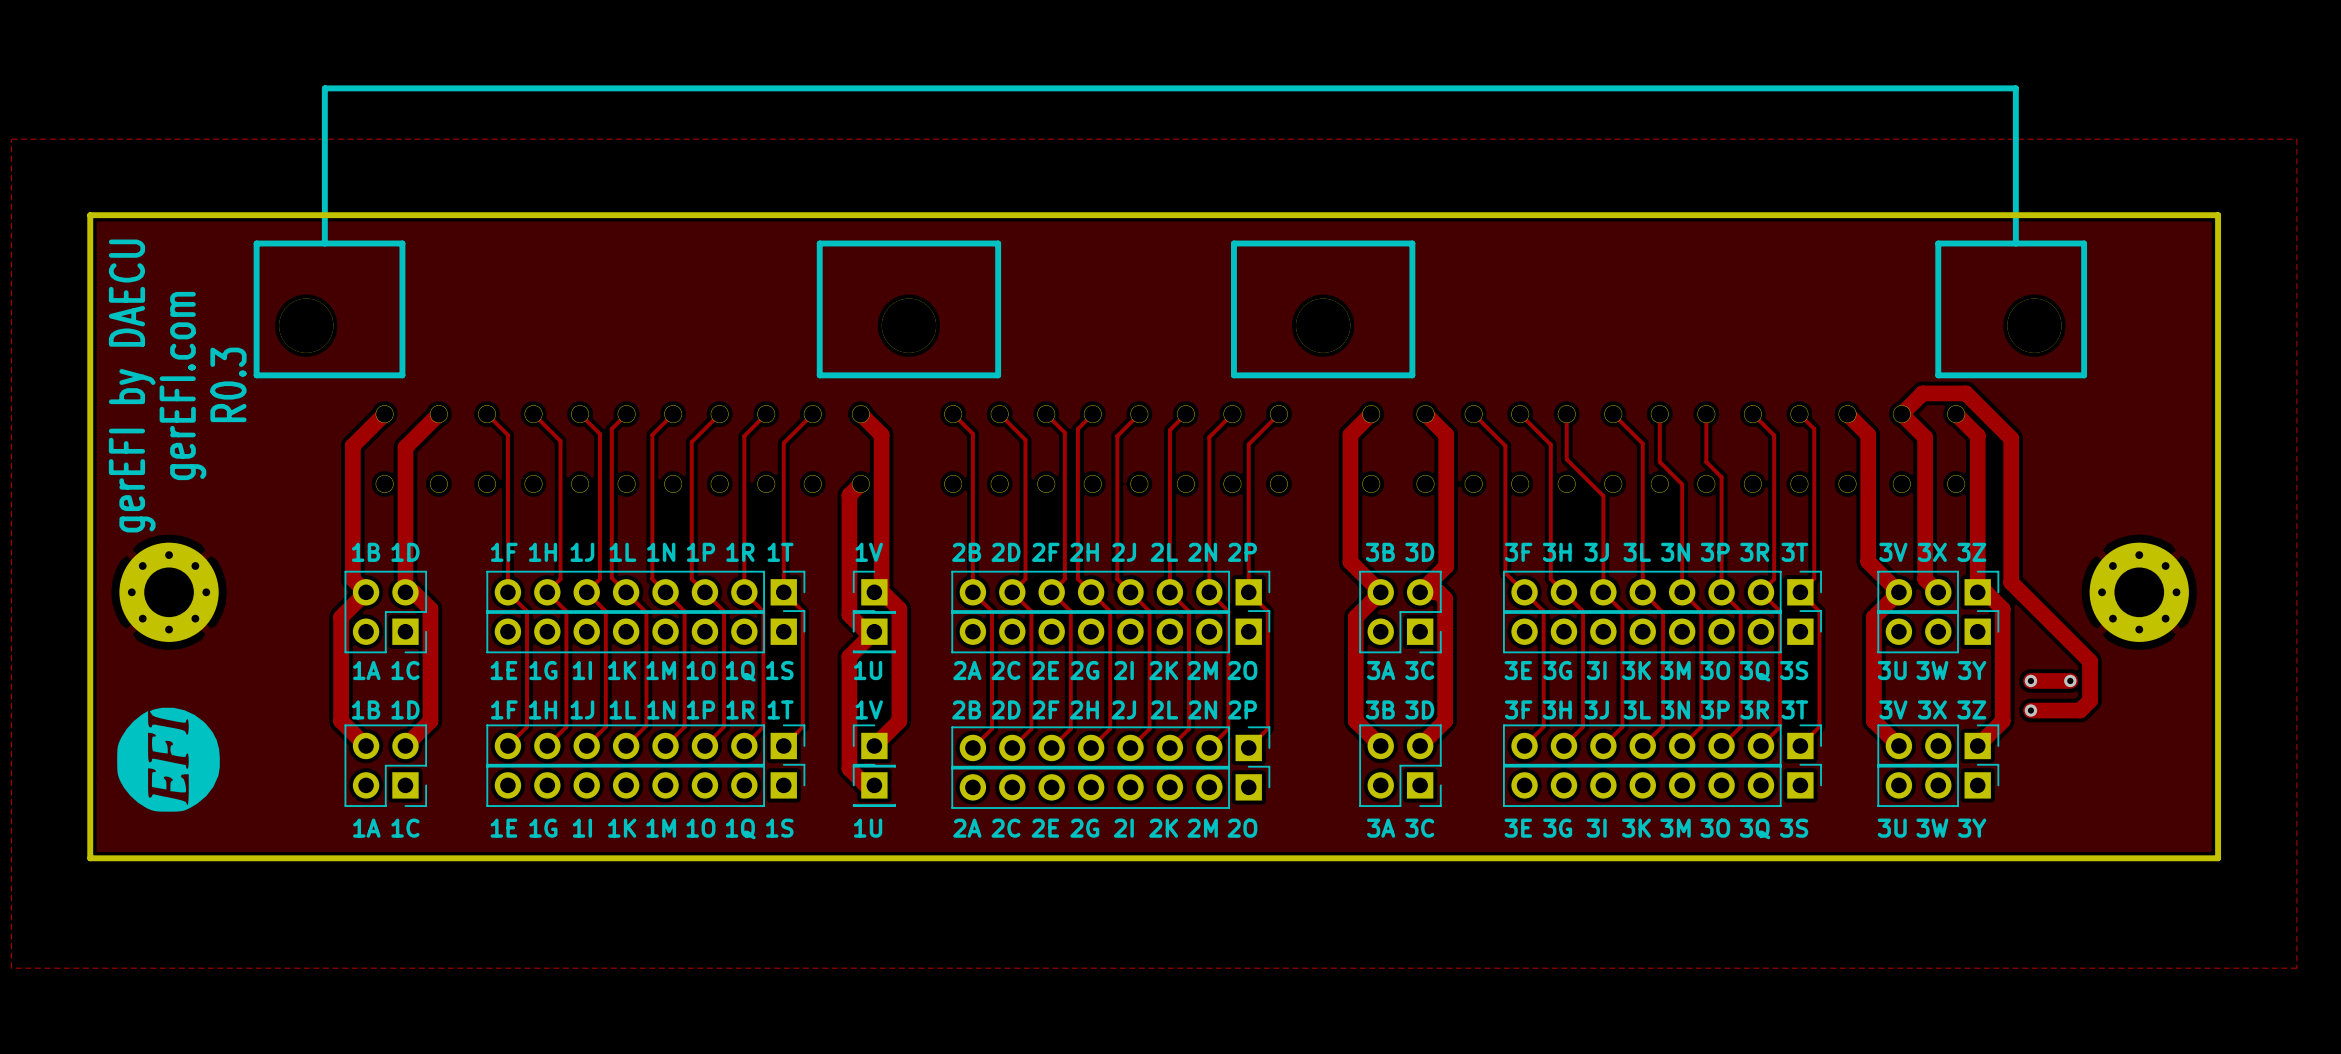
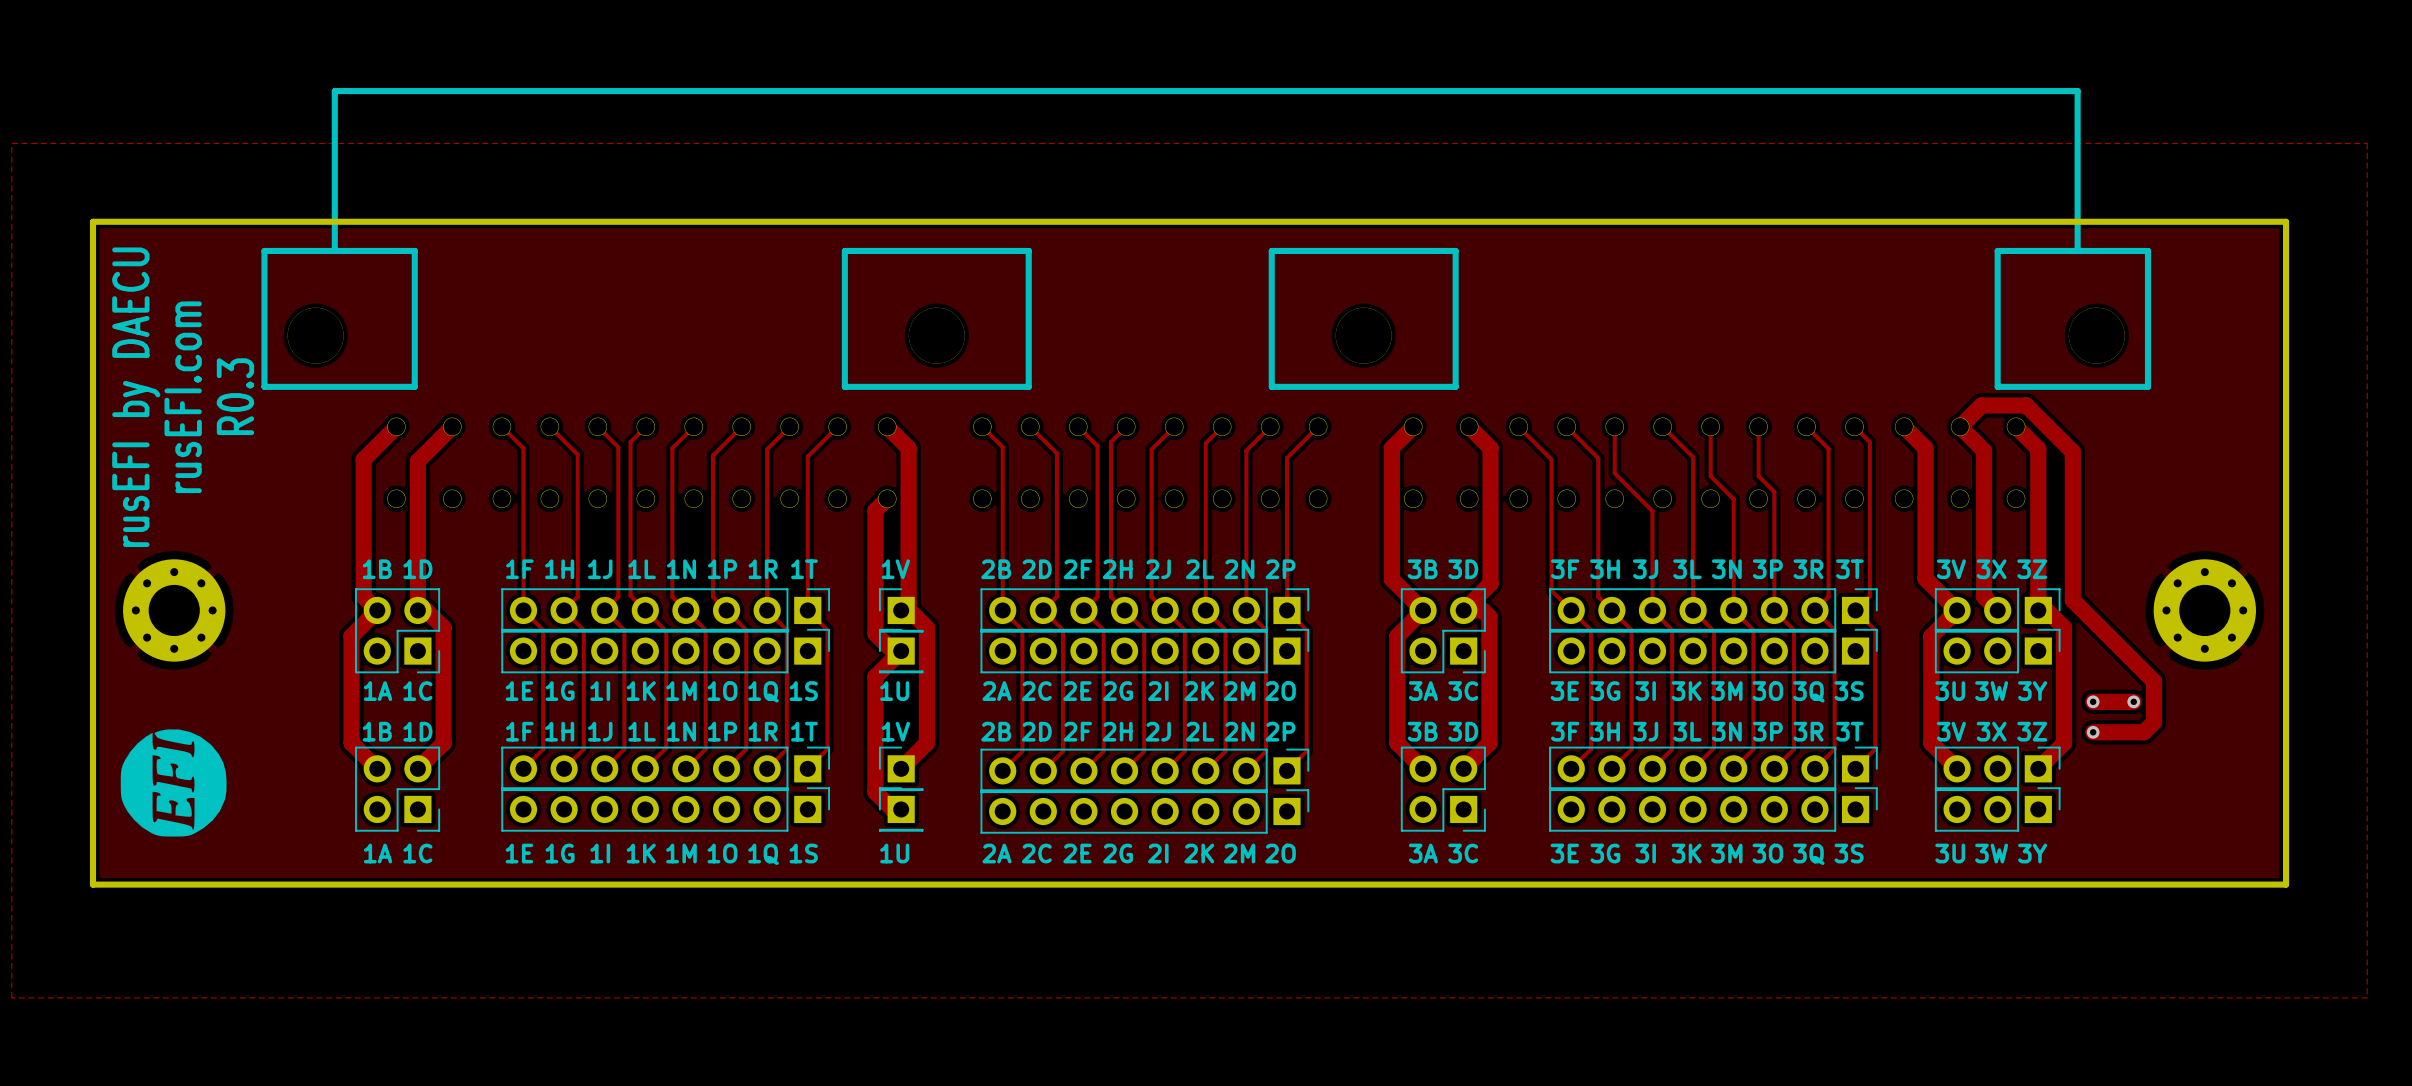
text: gerEFI by DAECU (132, 386) -> rusEFI by DAECU (136, 397)
text: gerEFI.com (182, 386) -> rusEFI.com (183, 397)

